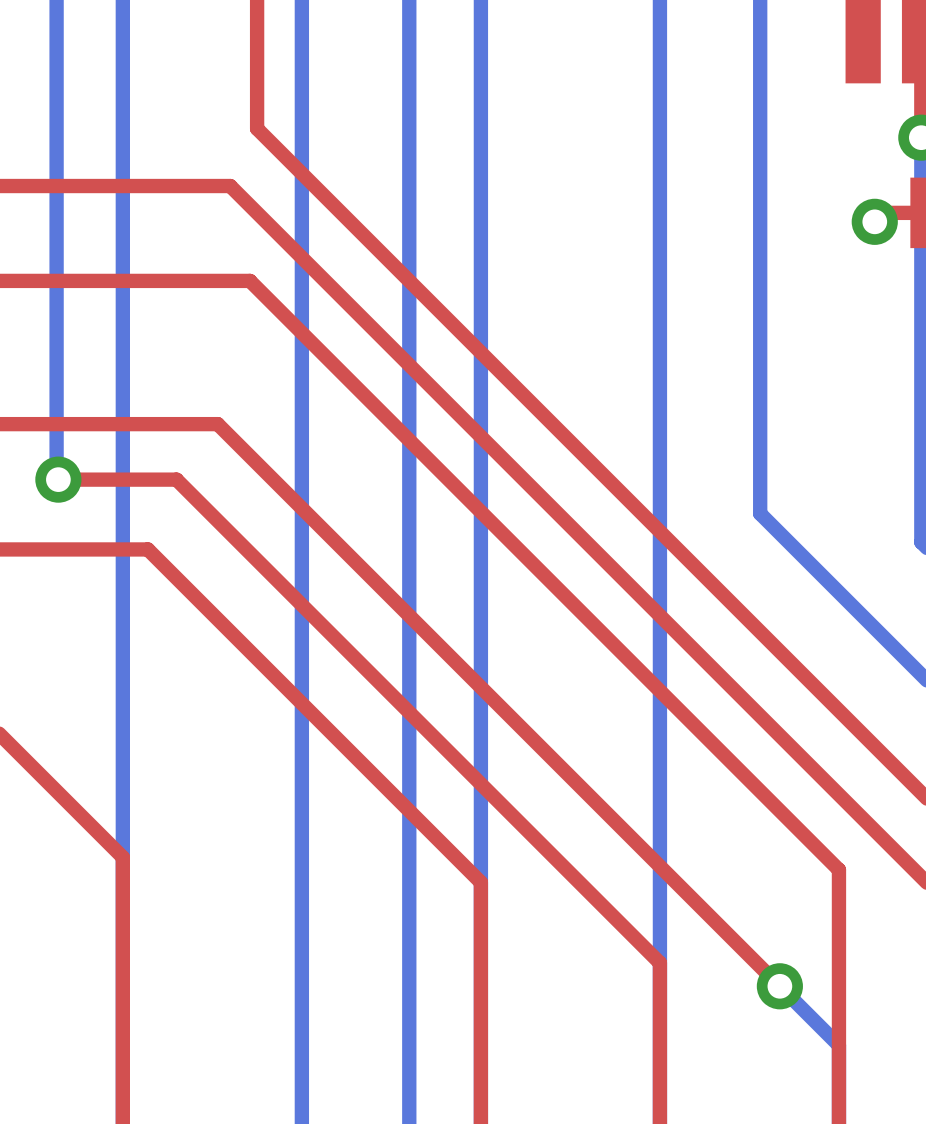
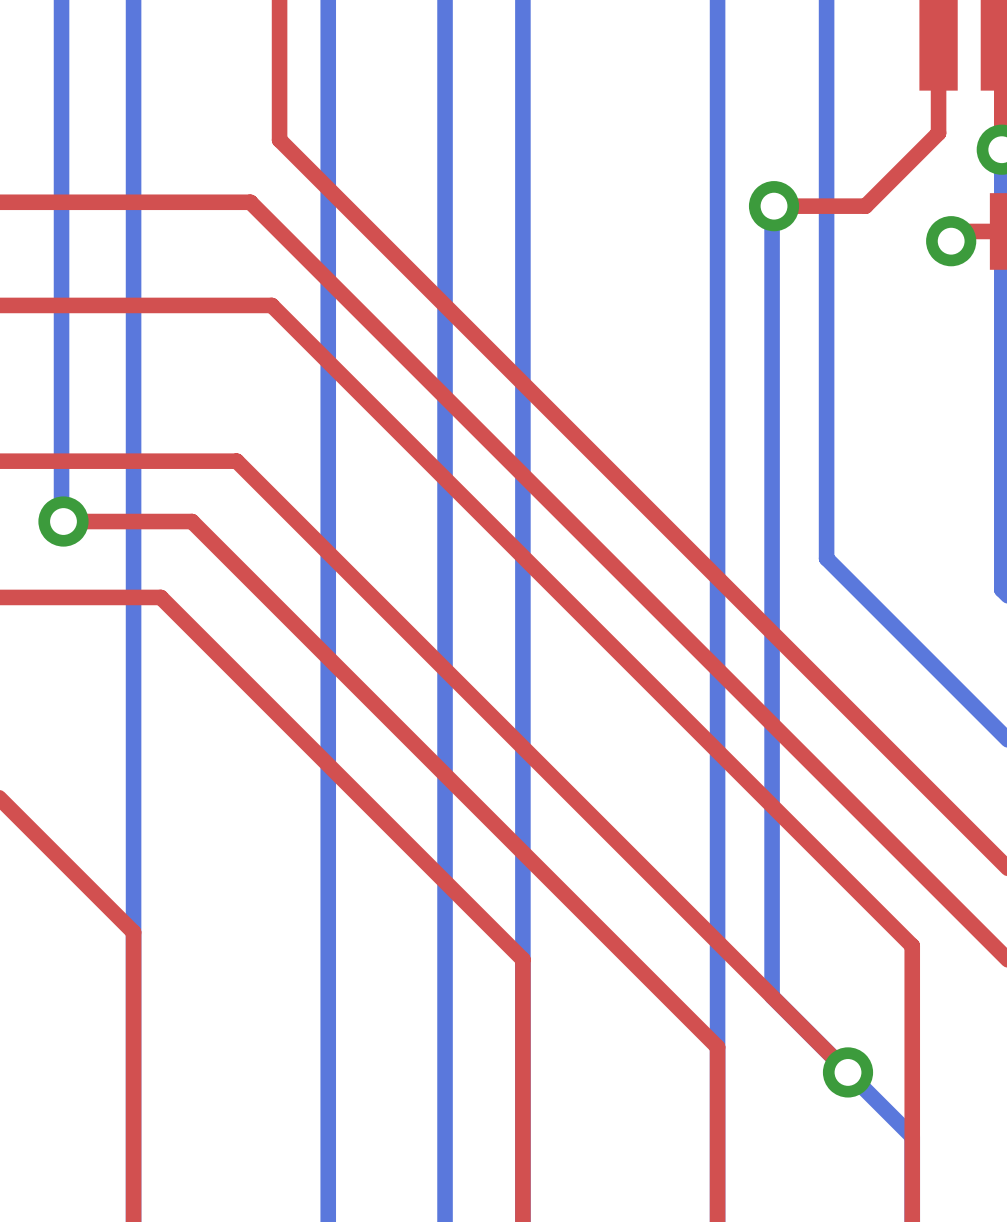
top track: none -> (938, 21) (938, 133) (865, 206) (774, 206)
bottom track: none -> (774, 206) (772, 208) (772, 996) (848, 1072)
via: none -> (774, 206)

